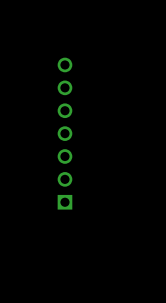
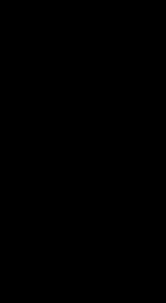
part: (64, 133) -> none

